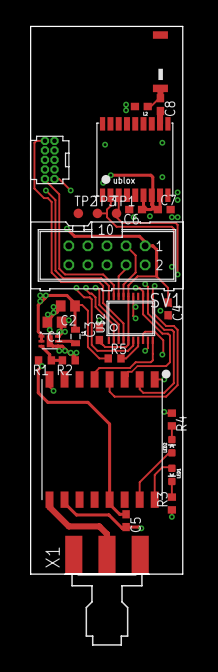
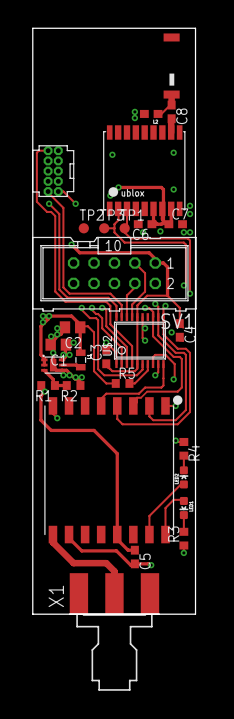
track: none -> (106, 342) (116, 352) (116, 364)

